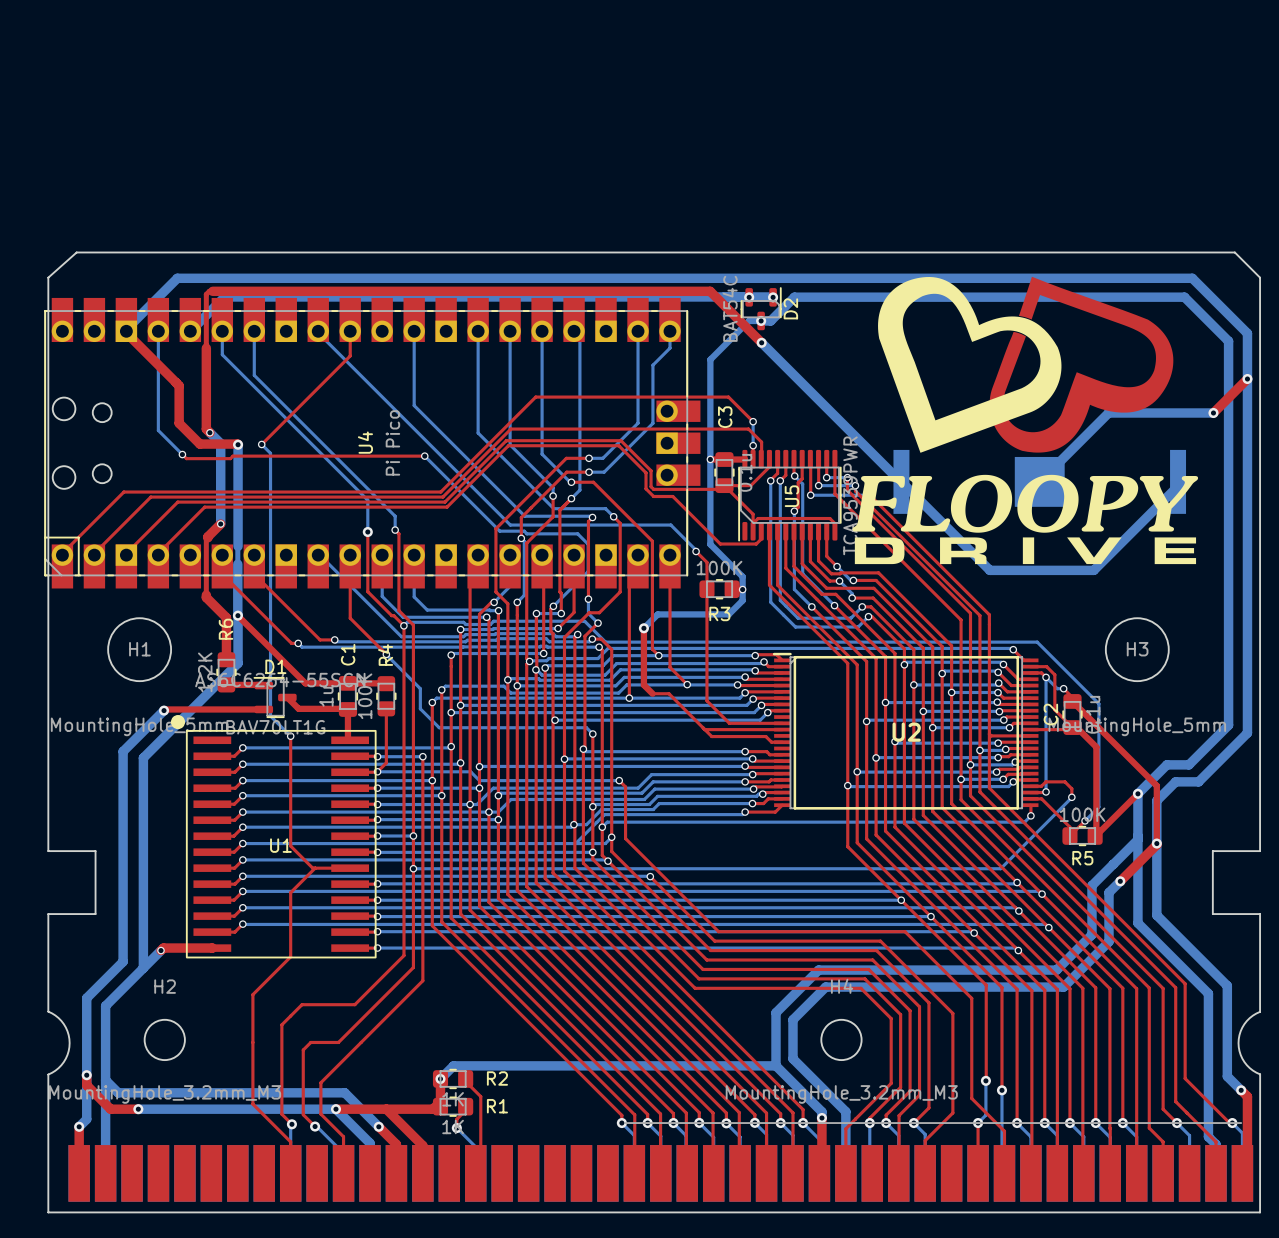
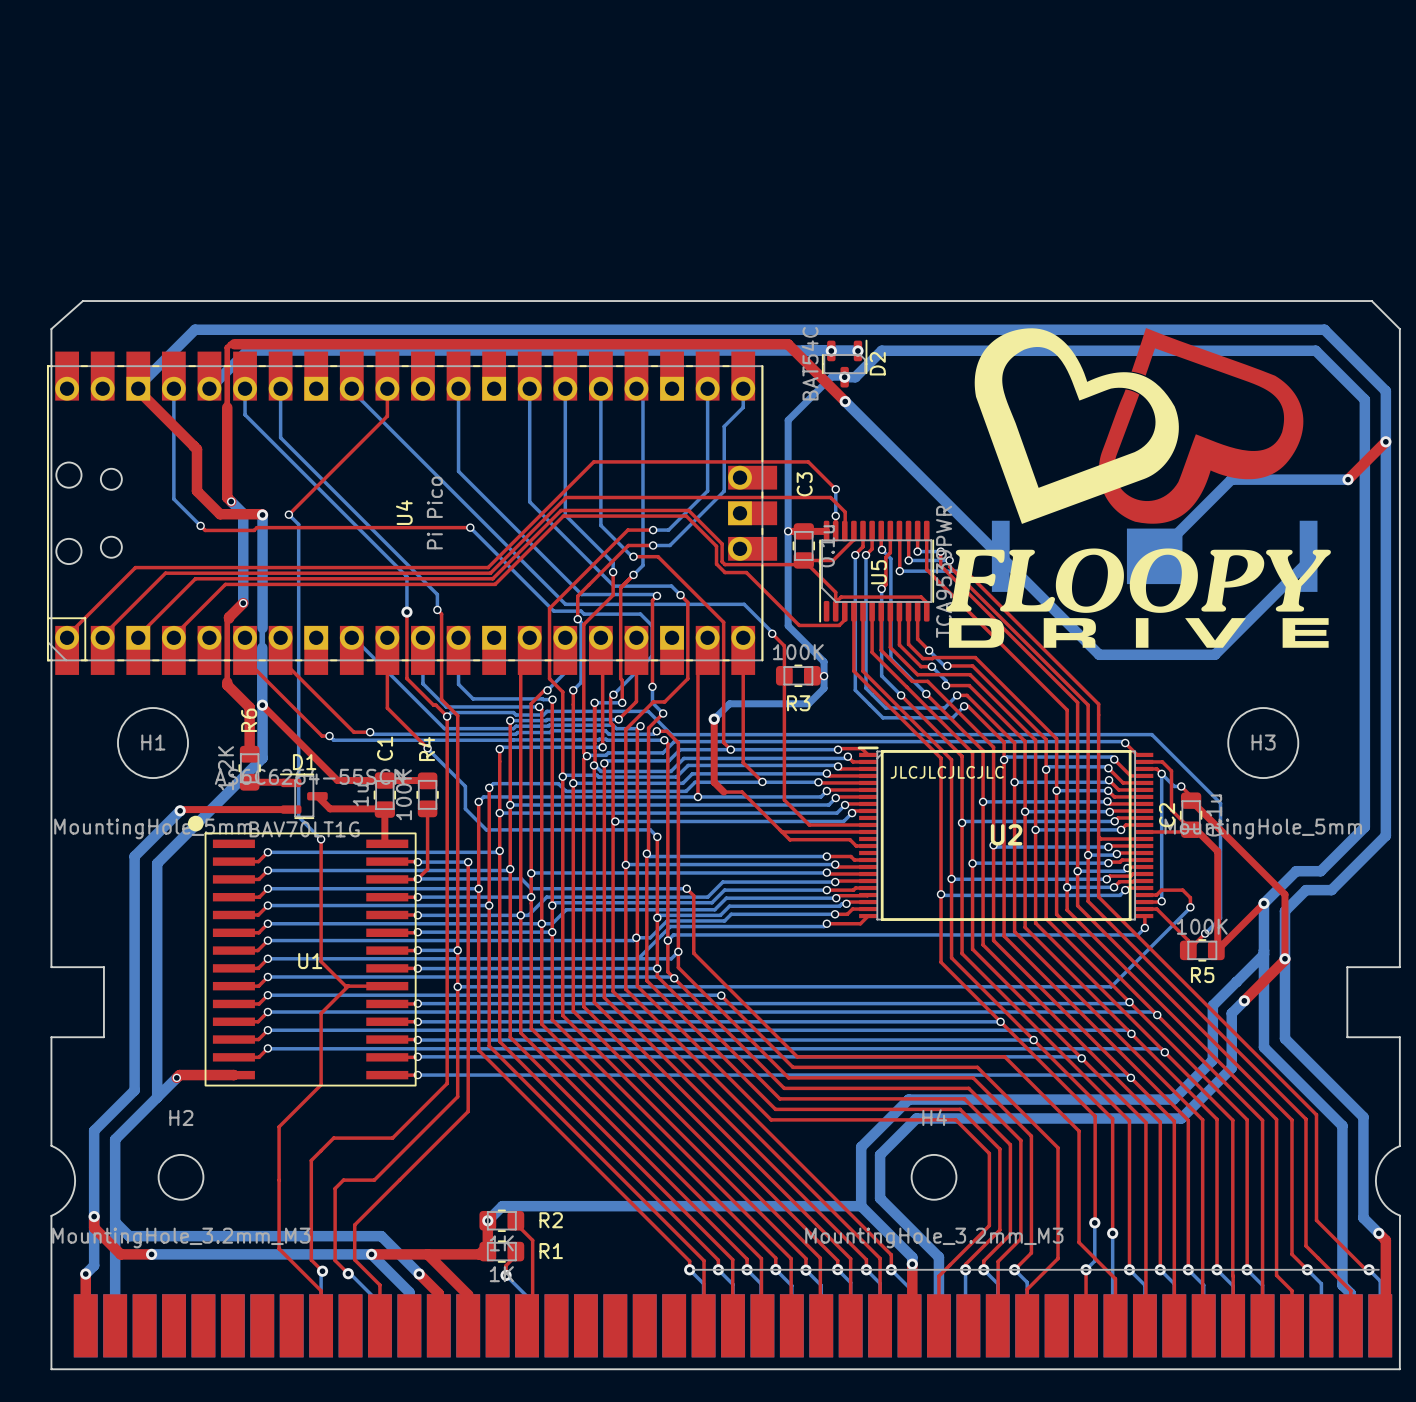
text: none -> JLCJLCJLCJLC (947, 772)

